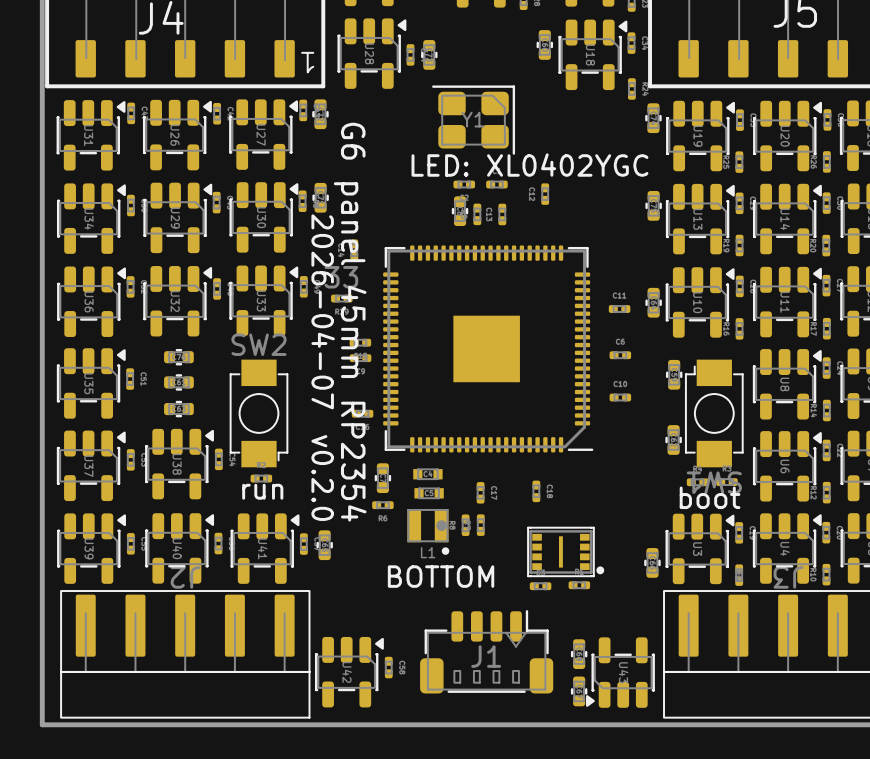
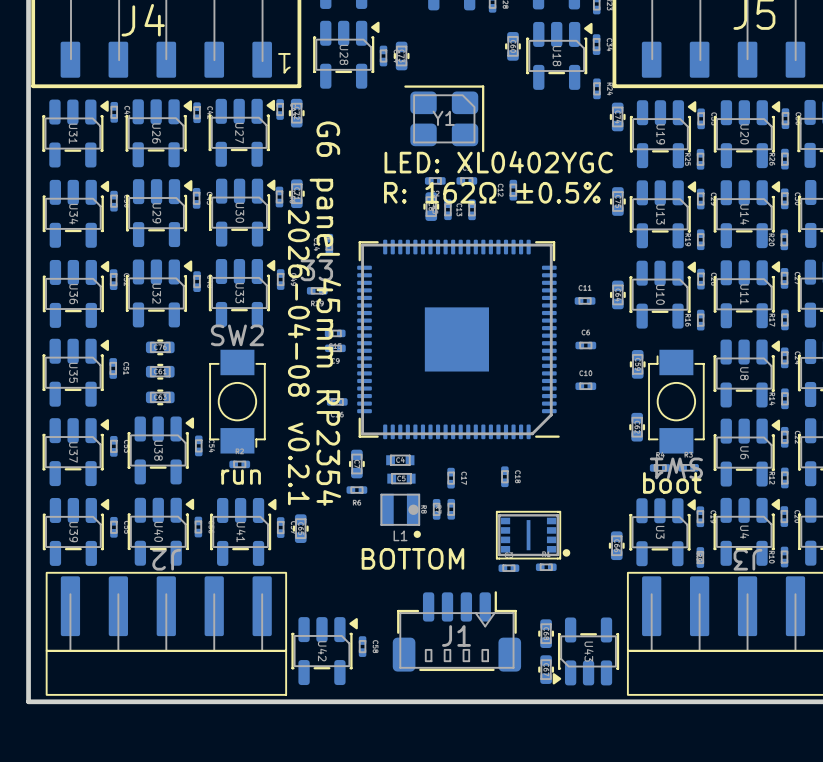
text: none -> R: 162Ω ±0.5% (492, 192)
text: 2026-04-07 (323, 311) -> 2026-04-08 (299, 303)
text: v0.2.0 (322, 477) -> v0.2.1 (298, 463)

